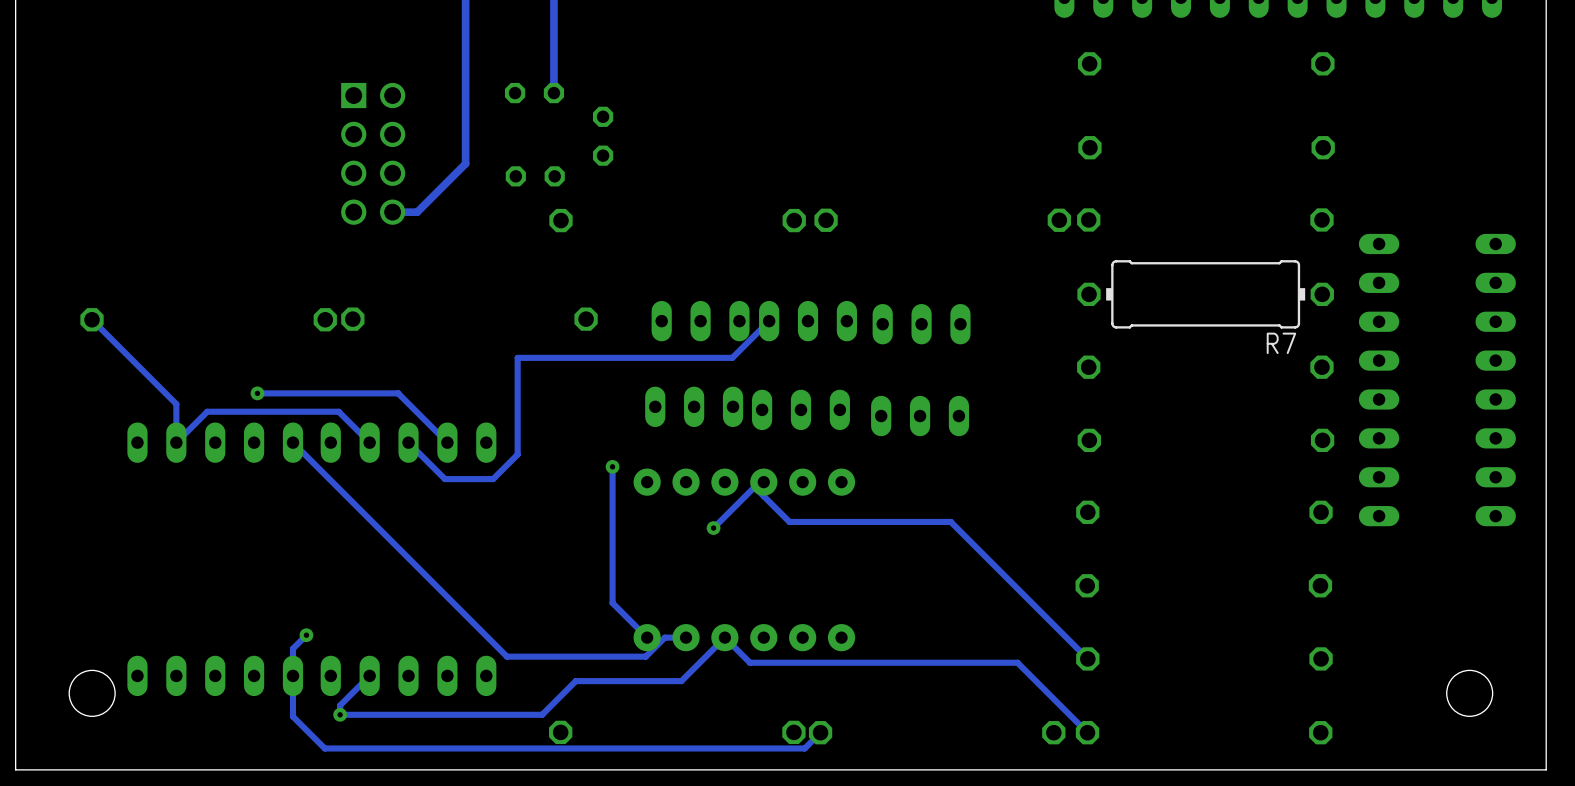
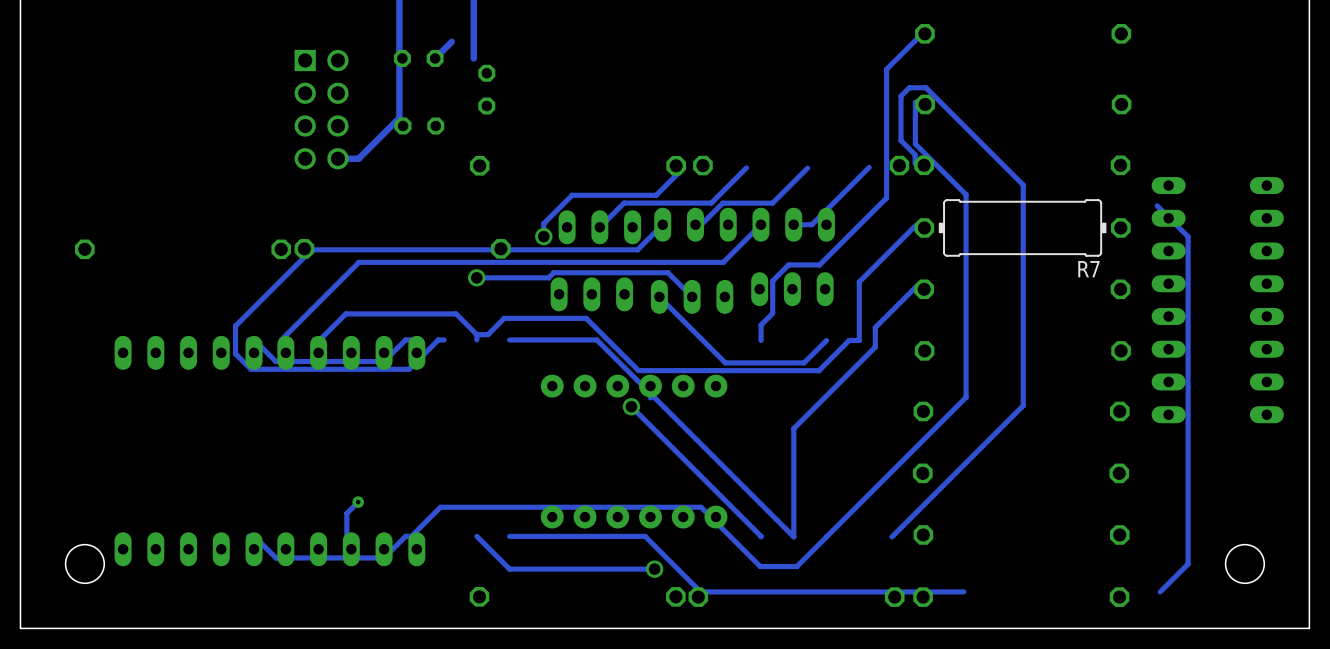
track: none -> (915, 40) (886, 69) (886, 197) (819, 264) (788, 264) (772, 280) (772, 313) (761, 325) (761, 340)
track: none -> (451, 41) (435, 58)
part: none -> (418, 58)
part: (534, 93) -> none
part: none -> (486, 89)
part: (603, 136) -> none
track: none -> (915, 102) (915, 143) (966, 194) (966, 397) (796, 566) (760, 566) (701, 507) (440, 507) (411, 536) (405, 536) (384, 557) (275, 557) (254, 536) (248, 536)
part: none -> (419, 125)
part: (535, 176) -> none
track: none -> (915, 164) (915, 154) (901, 140) (901, 96) (909, 87) (926, 87) (1023, 185) (1023, 405) (892, 536)
track: none -> (683, 167) (656, 195) (572, 195) (543, 223) (543, 236)
track: none -> (869, 167) (811, 224) (793, 224)
track: none -> (746, 167) (711, 203) (624, 203) (599, 227)
track: none -> (807, 168) (772, 203) (722, 203) (701, 224) (695, 224)
track: none -> (1157, 205) (1188, 236) (1188, 564) (1160, 591)
track: none -> (662, 224) (637, 249) (311, 249) (235, 326) (235, 353) (250, 369) (409, 369) (438, 339) (444, 339)
part: none -> (695, 224)
track: none -> (760, 224) (723, 262) (358, 262) (281, 339)
part: none -> (793, 224)
track: none -> (915, 225) (859, 281) (859, 340) (849, 340) (818, 370) (638, 370) (586, 318) (504, 318) (487, 334) (476, 334)
part: none -> (599, 227)
via: none -> (543, 236)
track: (92, 319) (176, 404) (176, 442) (207, 411) (338, 411) (369, 442) -> none
part: (700, 321) -> none
track: (769, 321) (732, 357) (517, 357) (517, 454) (493, 479) (444, 479) (408, 442) -> none
part: (808, 321) -> none
part: (921, 324) -> none
track: none -> (476, 277) (548, 277) (553, 272) (667, 272) (692, 296)
via: none -> (476, 277)
track: none -> (915, 287) (875, 327) (875, 347) (793, 428) (793, 536) (596, 339) (509, 339)
part: none -> (792, 289)
part: none -> (591, 294)
track: none -> (659, 296) (725, 362) (804, 362) (826, 340)
part: none -> (692, 296)
via: (257, 393) -> none
track: (398, 393) (257, 393) -> none
track: (398, 393) (447, 442) -> none
part: (694, 406) -> none
part: (800, 409) -> none
part: (920, 416) -> none
track: none -> (476, 334) (456, 313) (345, 313) (319, 339) (314, 339)
track: none -> (476, 334) (476, 339)
track: none -> (411, 339) (405, 339) (384, 361) (275, 361) (254, 339) (248, 339)
track: (292, 442) (506, 656) (645, 656) (664, 637) (686, 637) -> none
track: (612, 466) (612, 603) (647, 637) -> none
via: (612, 466) -> none
track: none -> (631, 406) (761, 536)
via: none -> (631, 406)
track: (713, 528) (754, 487) (789, 521) (950, 521) (1087, 658) -> none
via: (713, 528) -> none
track: none -> (358, 502) (346, 513) (346, 536)
via: none -> (358, 502)
track: (306, 635) (292, 648) (292, 716) (324, 748) (804, 748) (820, 732) -> none
via: (306, 635) -> none
track: none -> (476, 536) (509, 569) (654, 569)
track: none -> (509, 536) (645, 536) (700, 591) (963, 591)
track: (369, 675) (340, 705) (340, 714) (542, 714) (575, 681) (681, 681) (724, 637) (750, 662) (1017, 662) (1087, 732) -> none
via: none -> (654, 569)
via: (340, 714) -> none

